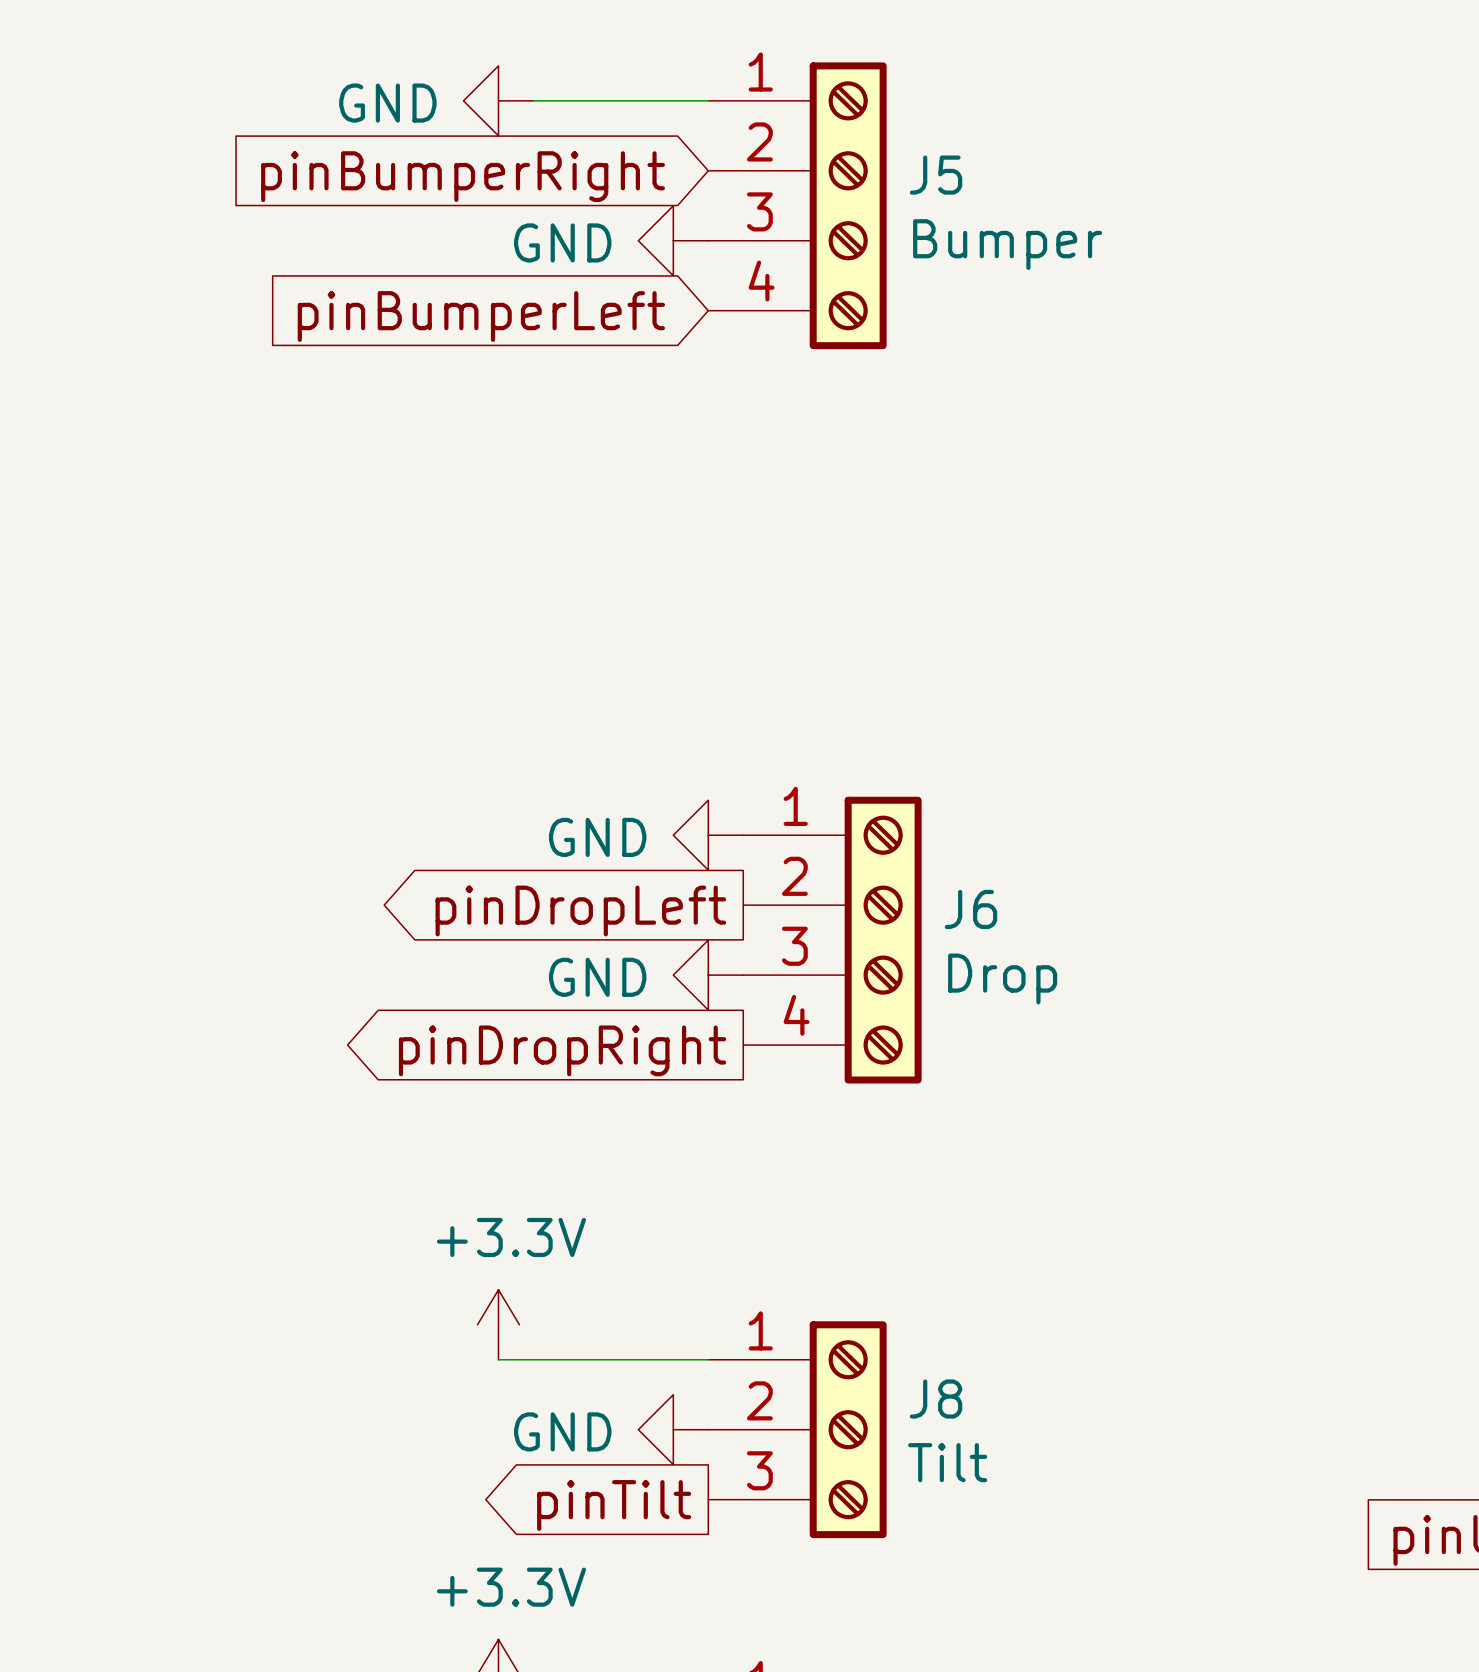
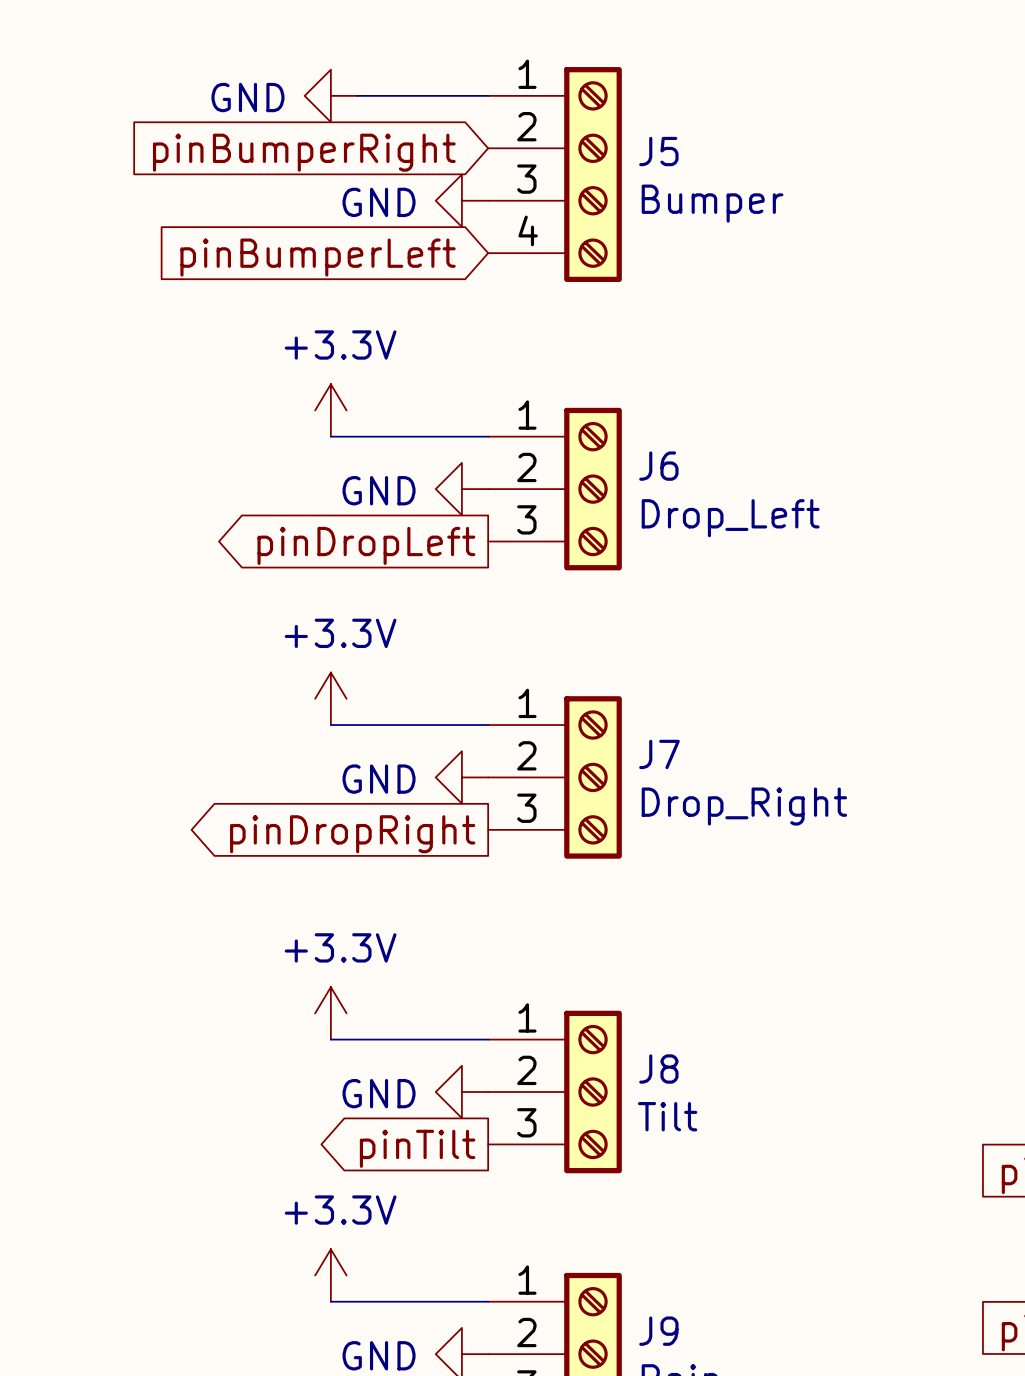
power symbol: none -> +3.3V (330, 410)
wire: none -> (330, 436) (488, 436)
power symbol: none -> GND (461, 489)
J6 symbol: [743, 796, 922, 1084] -> [488, 407, 622, 571]
power symbol: GND (708, 835) -> none
power symbol: none -> +3.3V (330, 698)
global label position: pinDropLeft (580, 910) -> pinDropLeft (366, 545)
power symbol position: GND (708, 975) -> GND (461, 777)
J6 value: Drop (1002, 978) -> Drop_Left (730, 518)
J7: none -> Drop_Right (555, 777)
global label position: pinDropRight (562, 1050) -> pinDropRight (352, 834)

